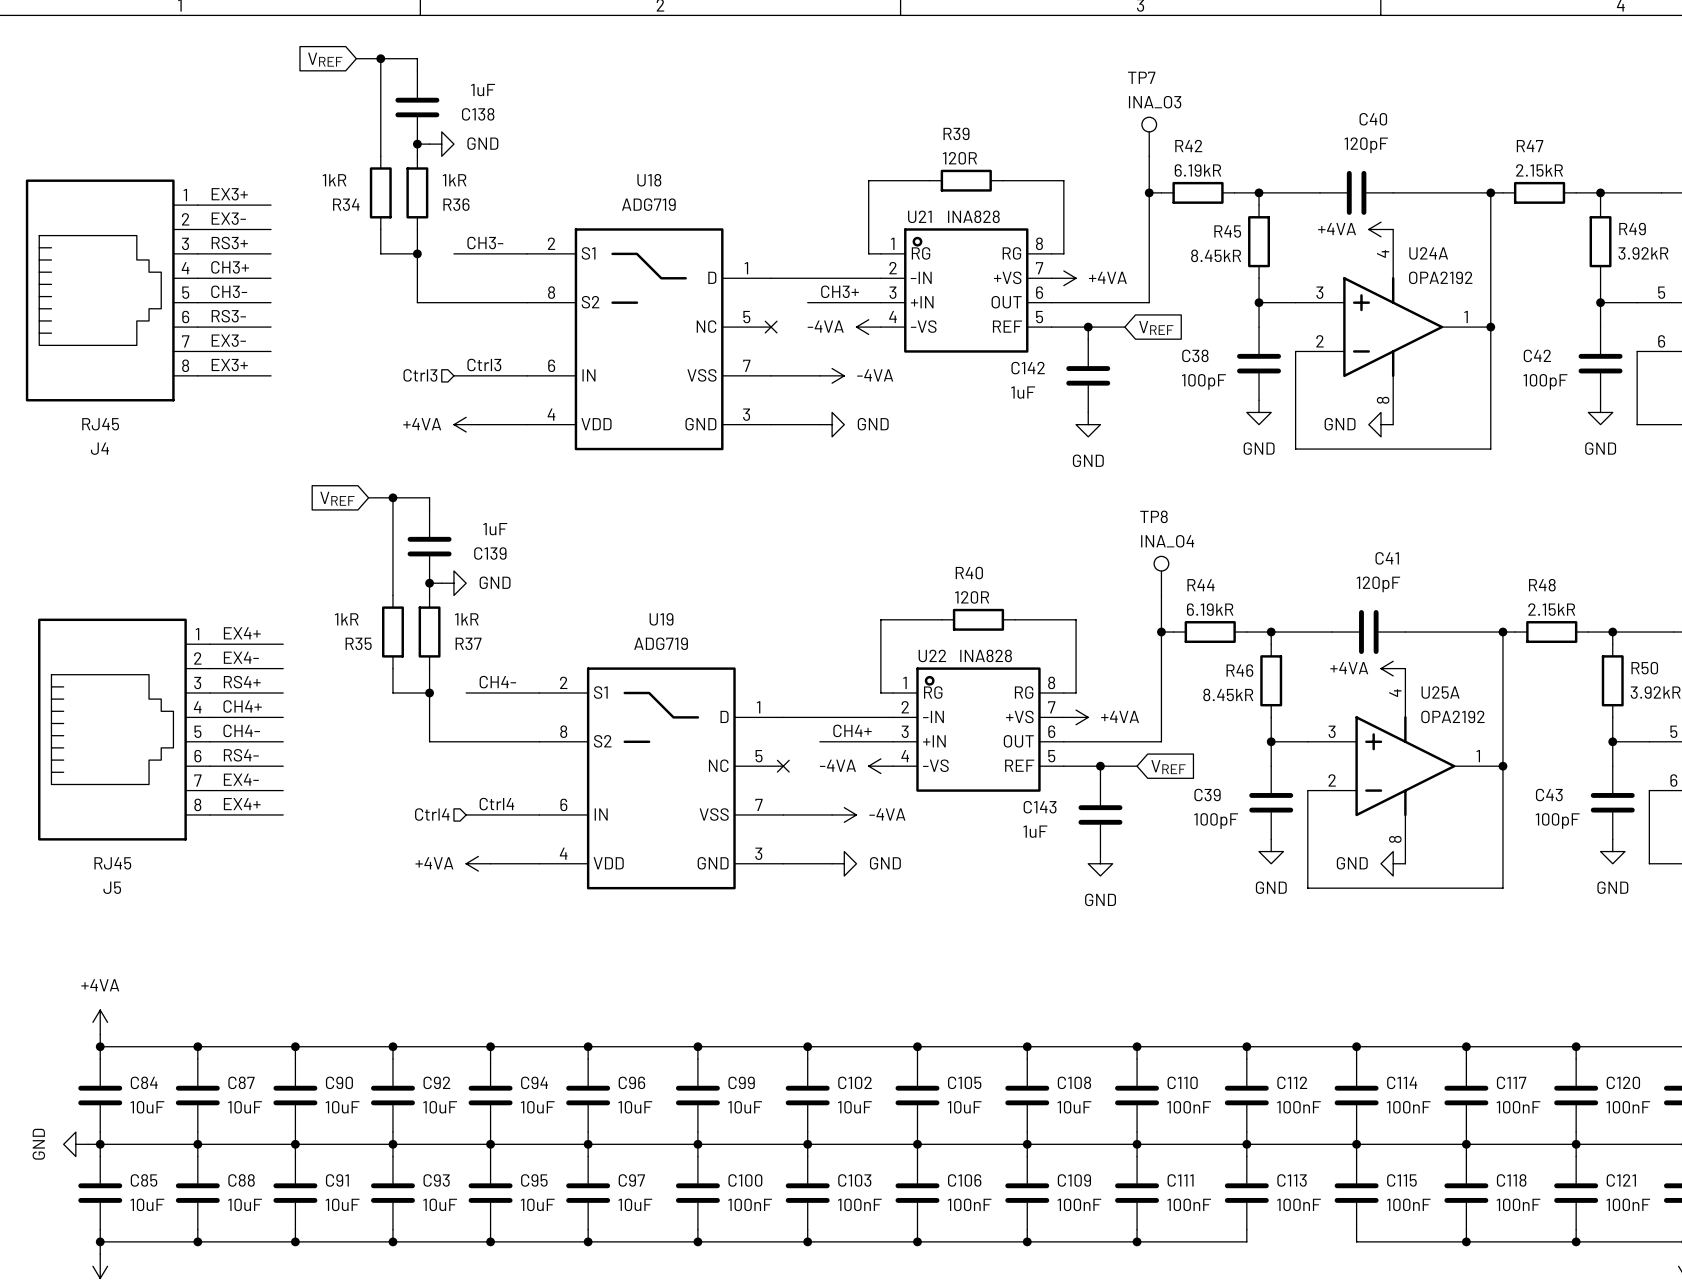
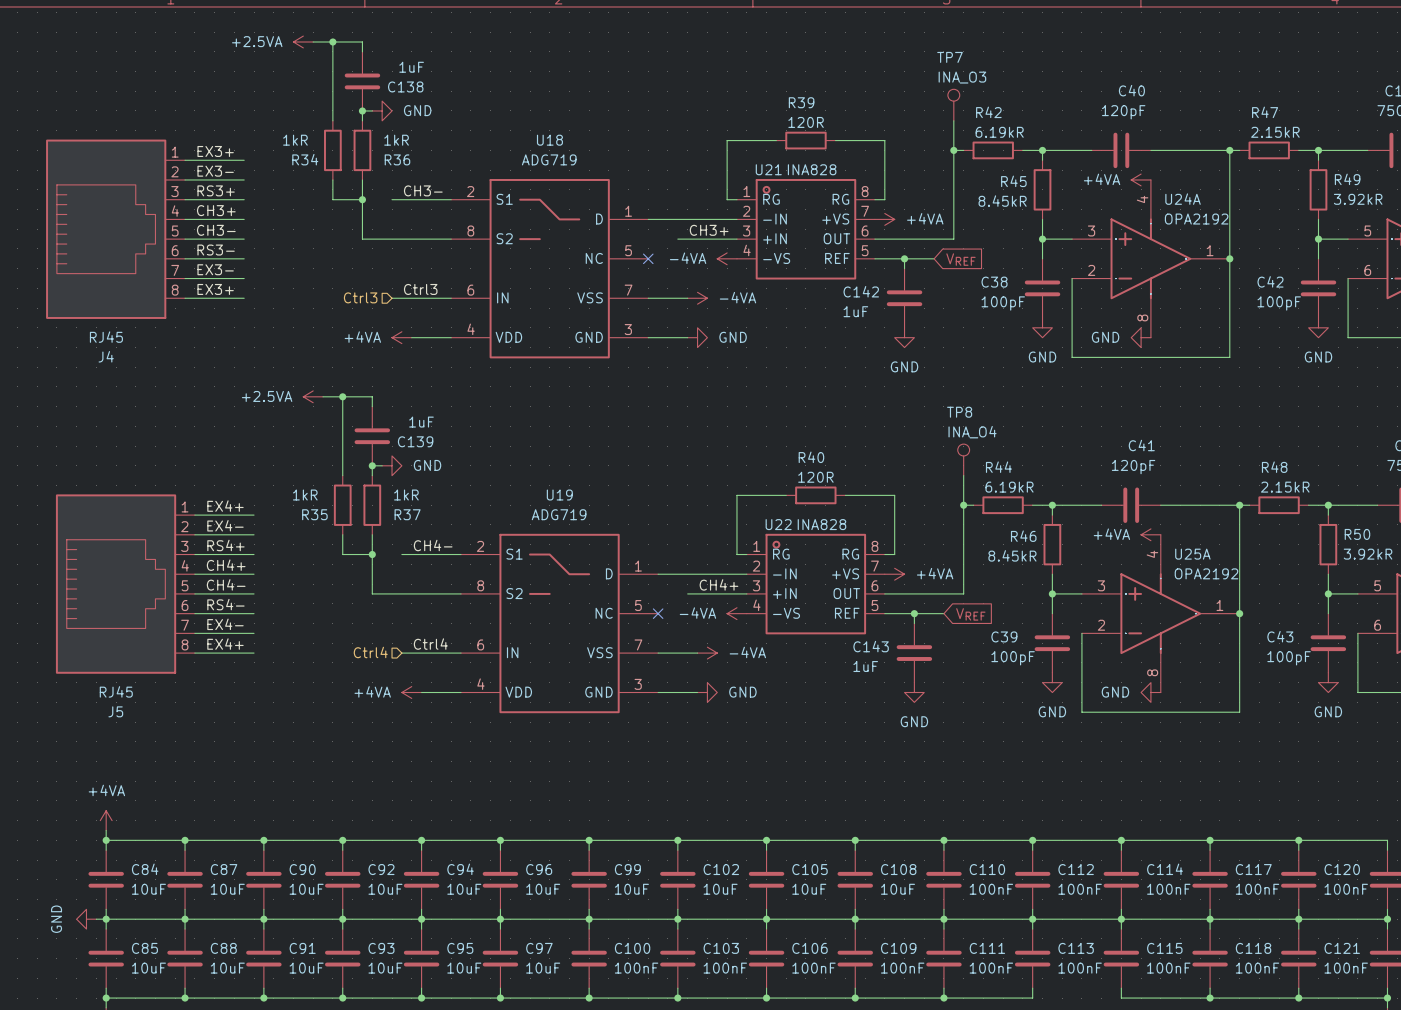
power symbol: none -> +2.5VA (303, 41)
global label: VREF (325, 59) -> none
power symbol: none -> +2.5VA (313, 396)
global label: VREF (337, 498) -> none

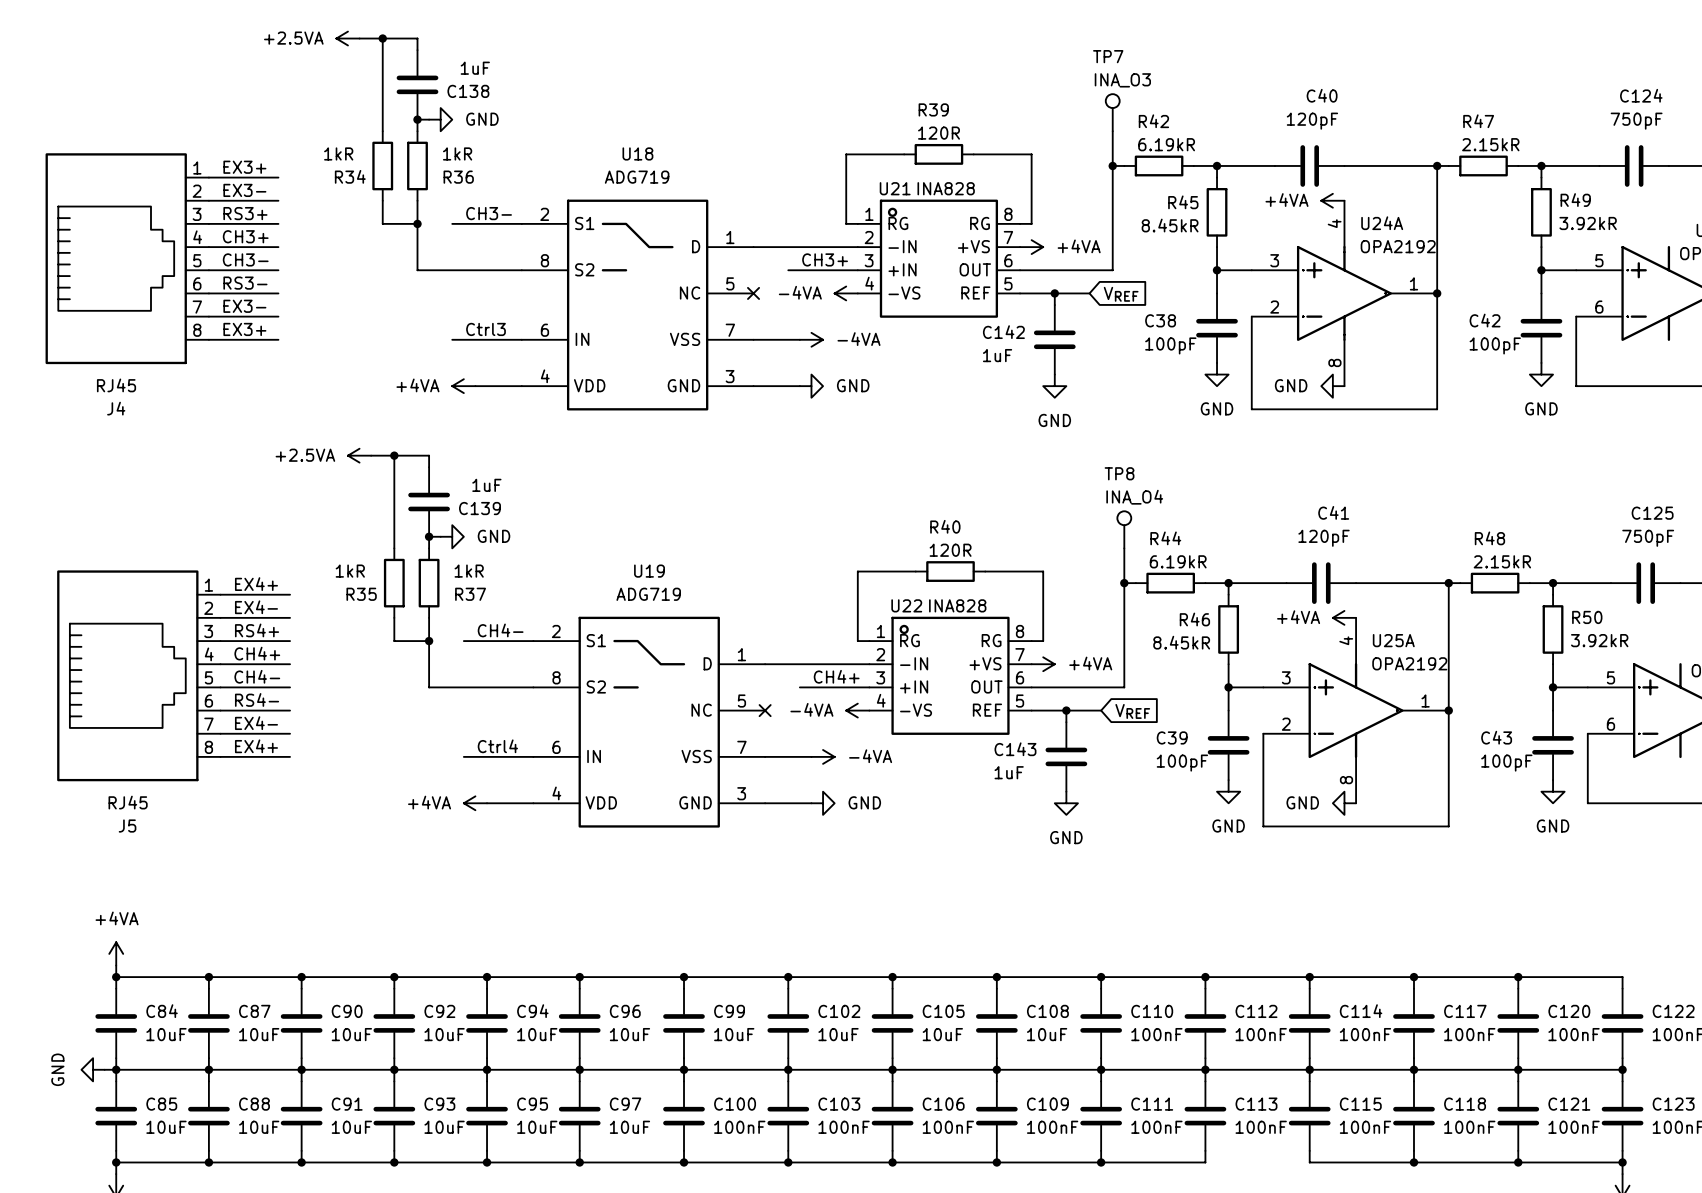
hierarchical label: Ctrl3 (360, 297) -> none
hierarchical label: Ctrl4 (370, 652) -> none

